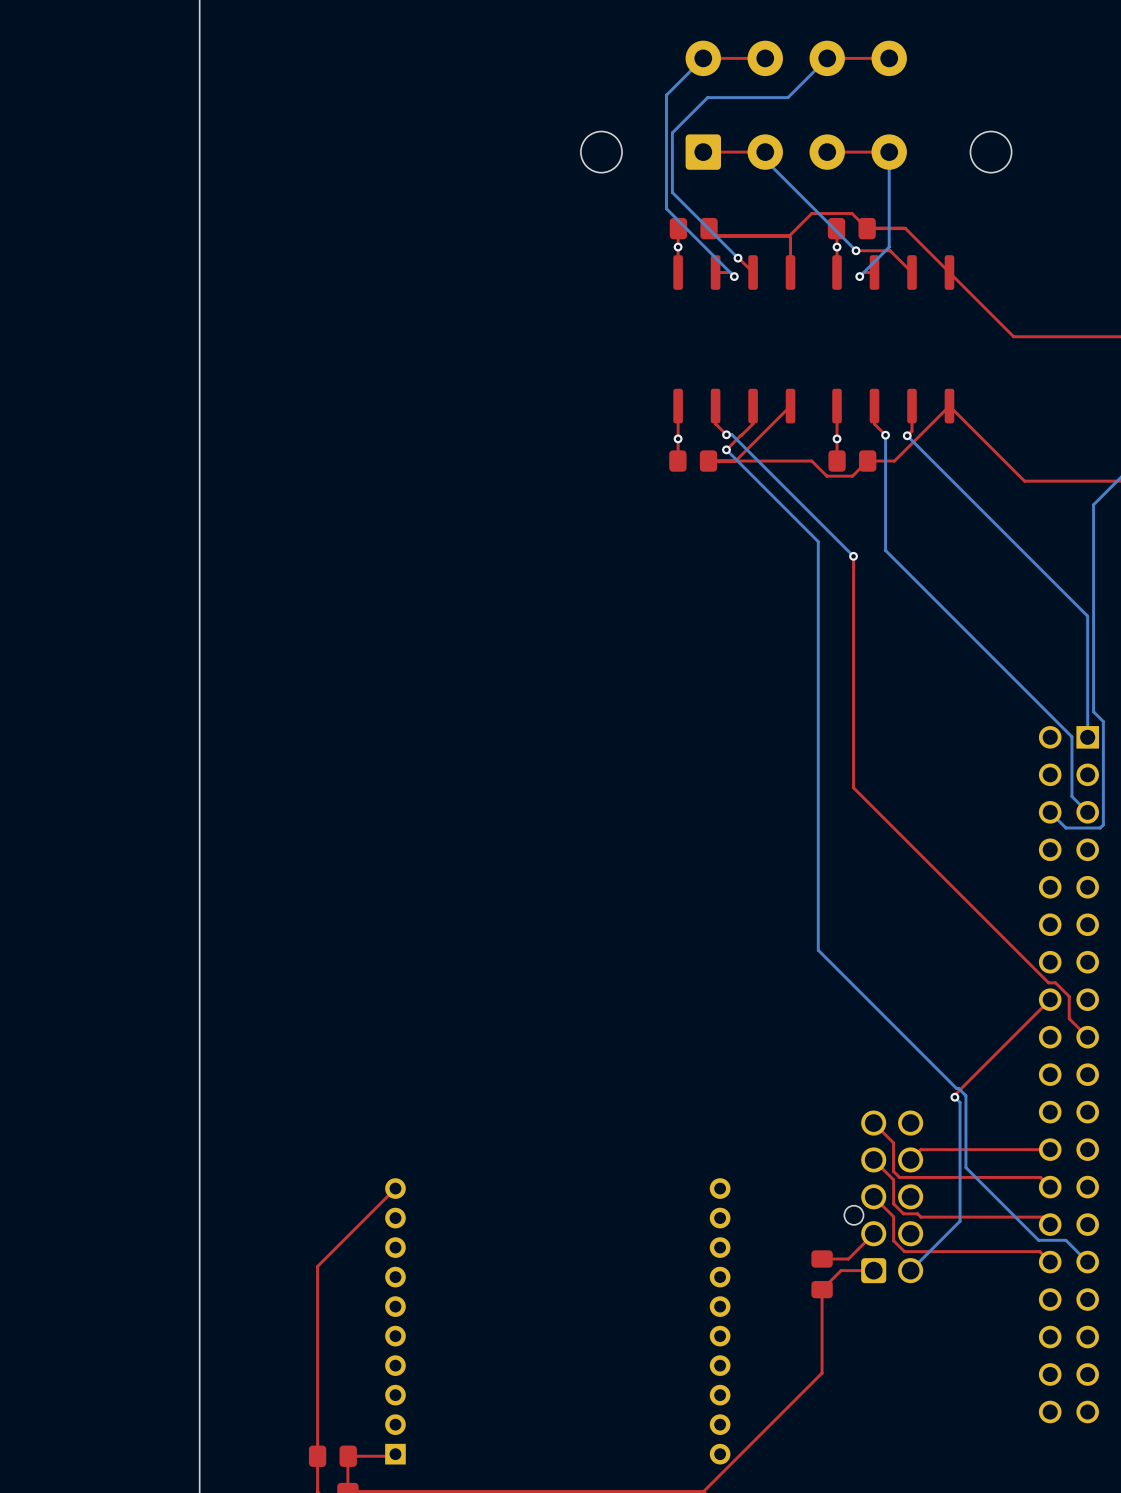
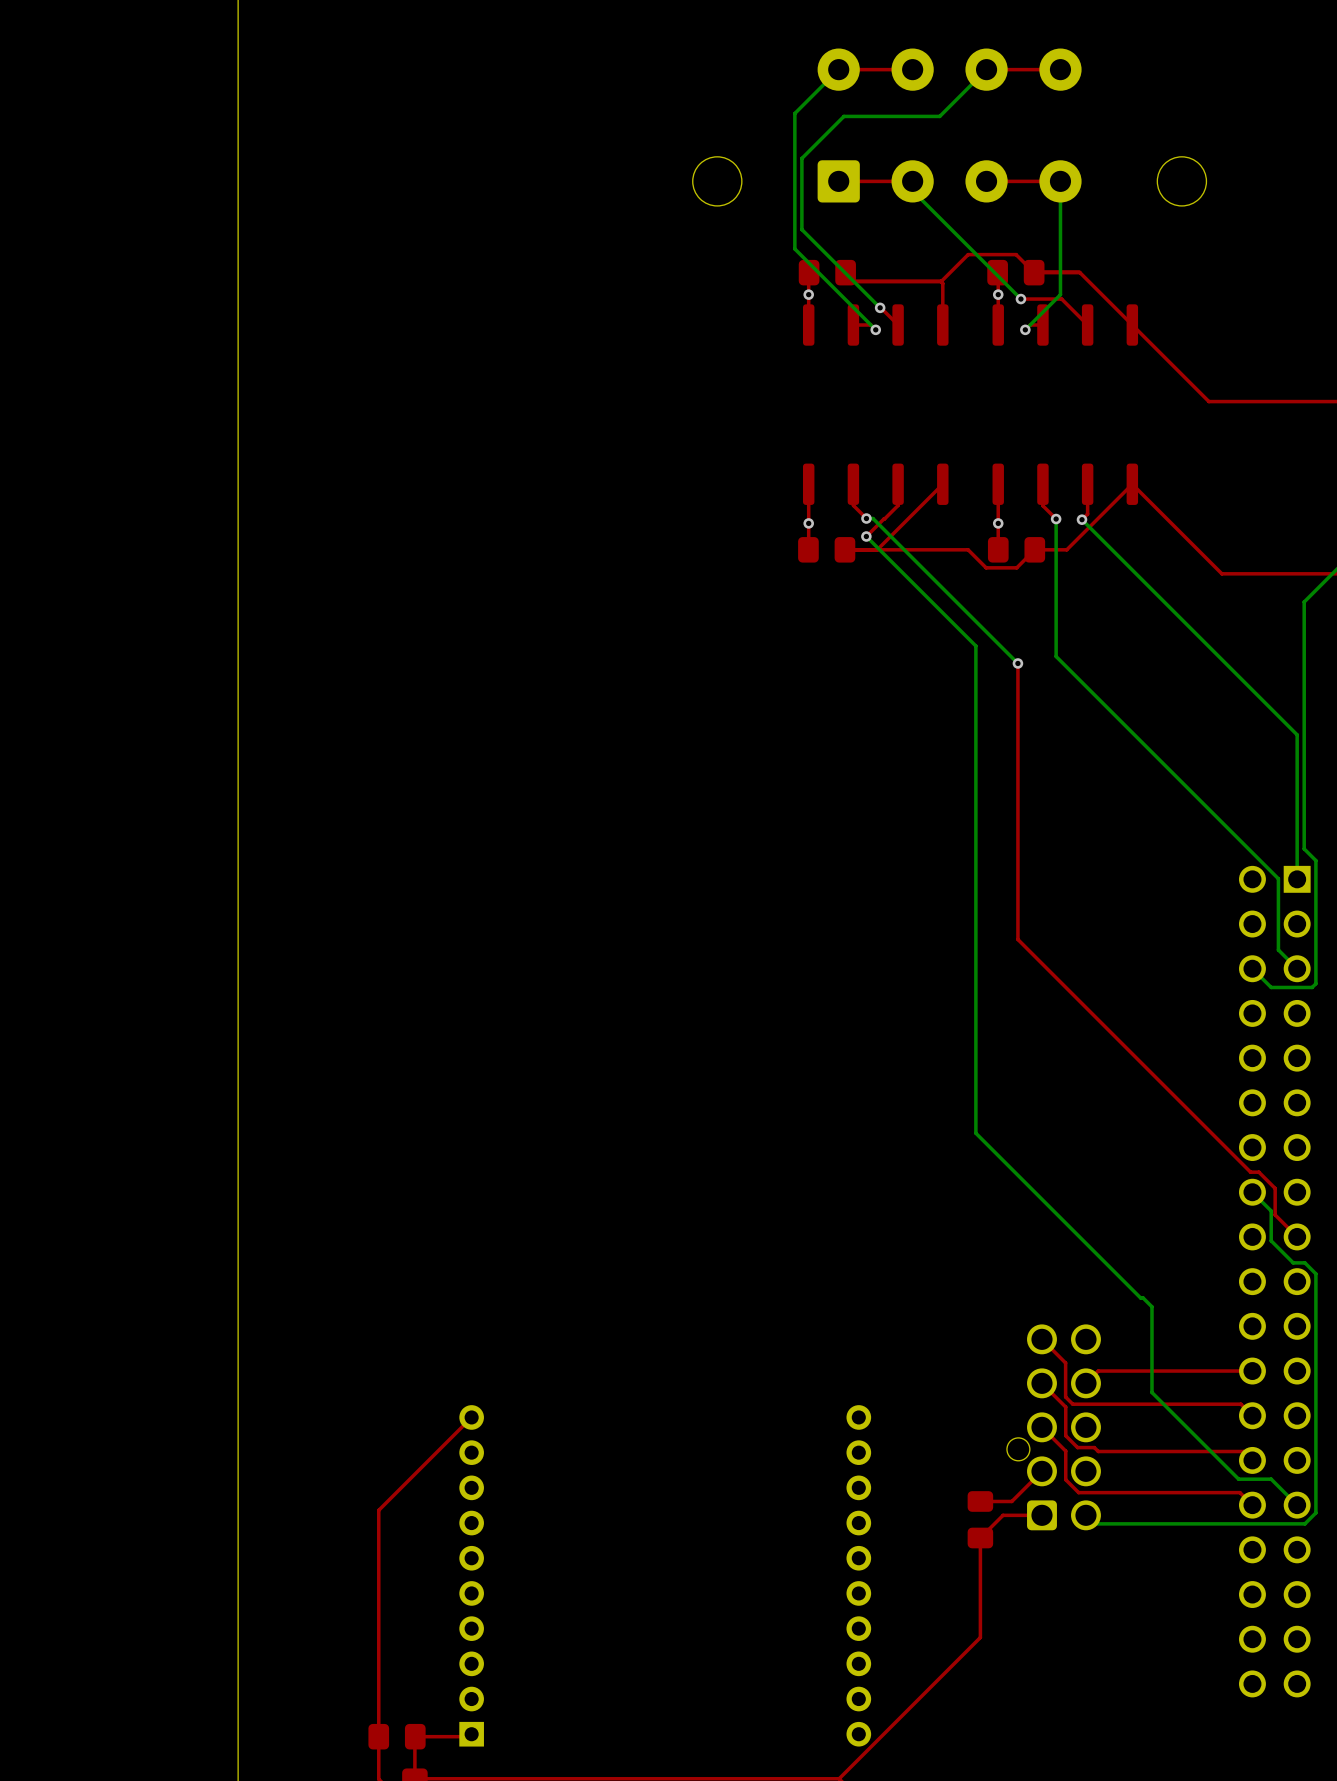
top track: (1050, 999) (954, 1095) (954, 1097) -> none
bottom track: (954, 1097) (960, 1102) (960, 1221) (910, 1270) -> (1252, 1192) (1271, 1210) (1271, 1240) (1293, 1262) (1304, 1262) (1315, 1273) (1315, 1512) (1304, 1523) (1094, 1523) (1085, 1515)
via: (954, 1097) -> none

